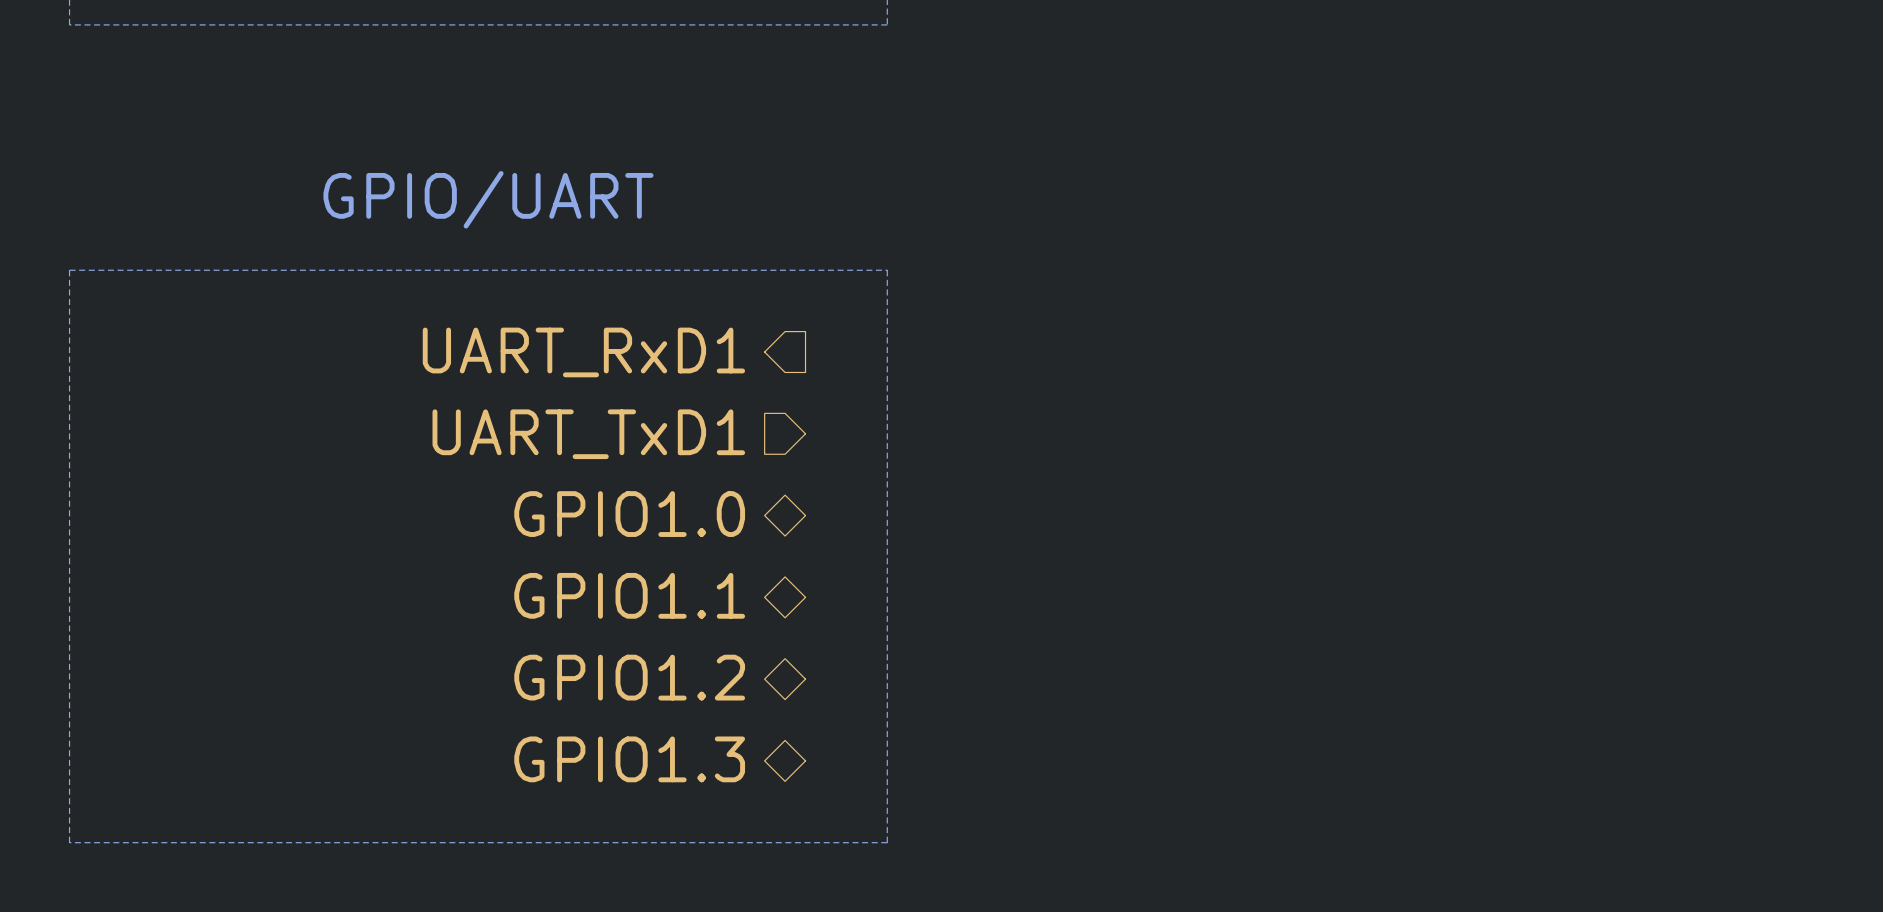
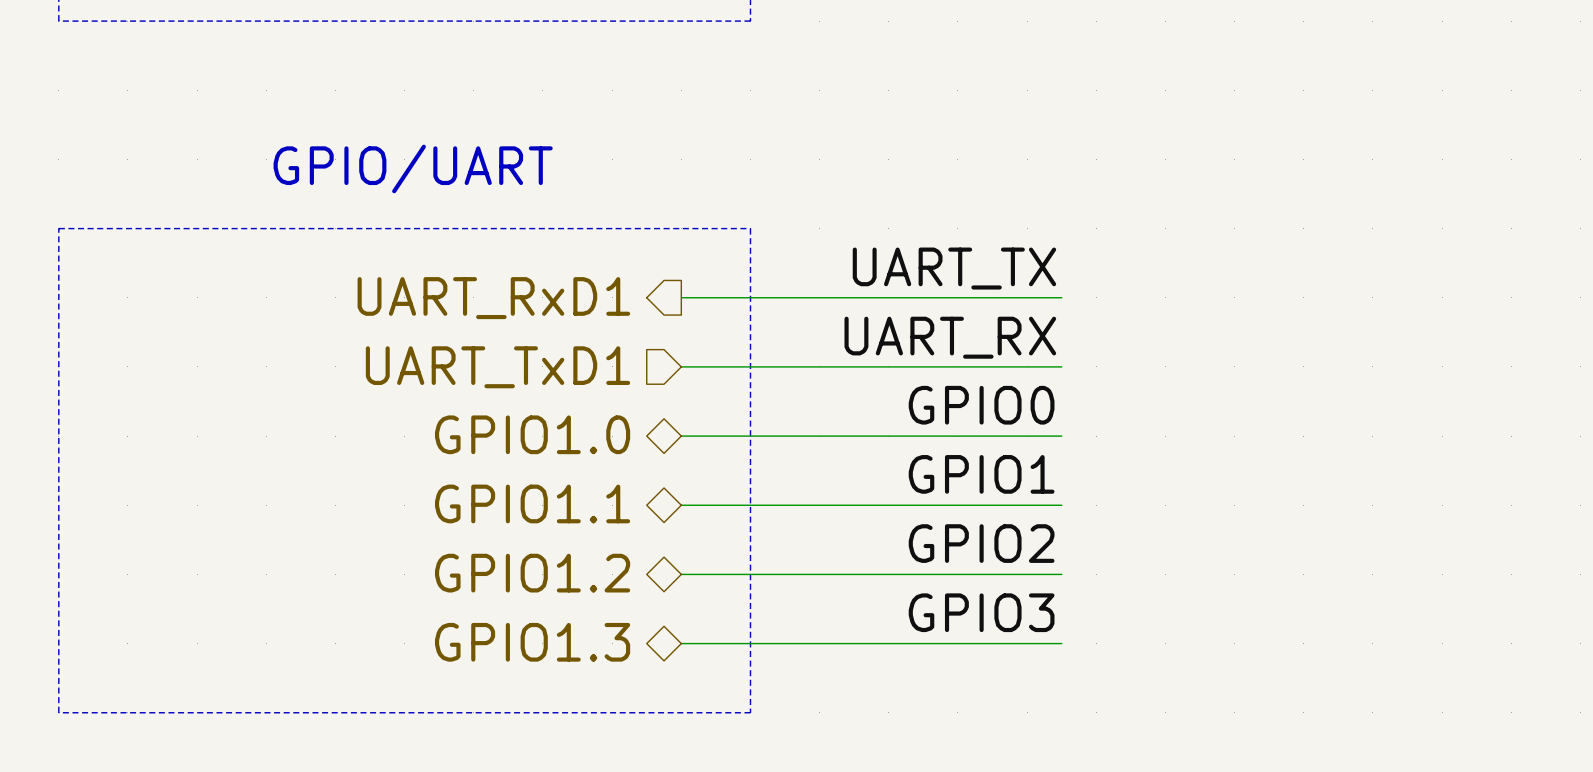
label: none -> UART_TX (954, 268)
wire: none -> (681, 297) (1061, 297)
label: none -> UART_RX (950, 337)
wire: none -> (681, 366) (1061, 366)
label: none -> GPIO0 (981, 405)
wire: none -> (681, 436) (1061, 436)
label: none -> GPIO1 (981, 474)
wire: none -> (681, 505) (1061, 505)
label: none -> GPIO2 (981, 543)
wire: none -> (681, 574) (1061, 574)
label: none -> GPIO3 (981, 612)
wire: none -> (681, 643) (1061, 643)

